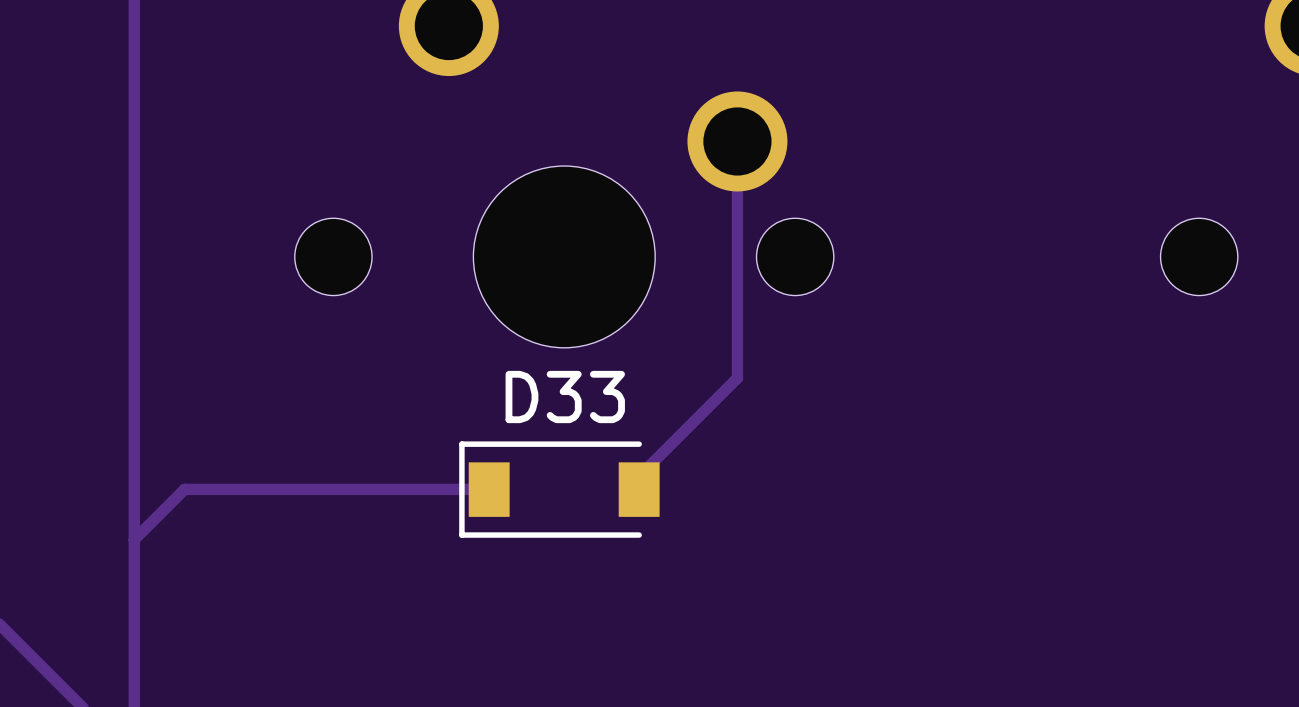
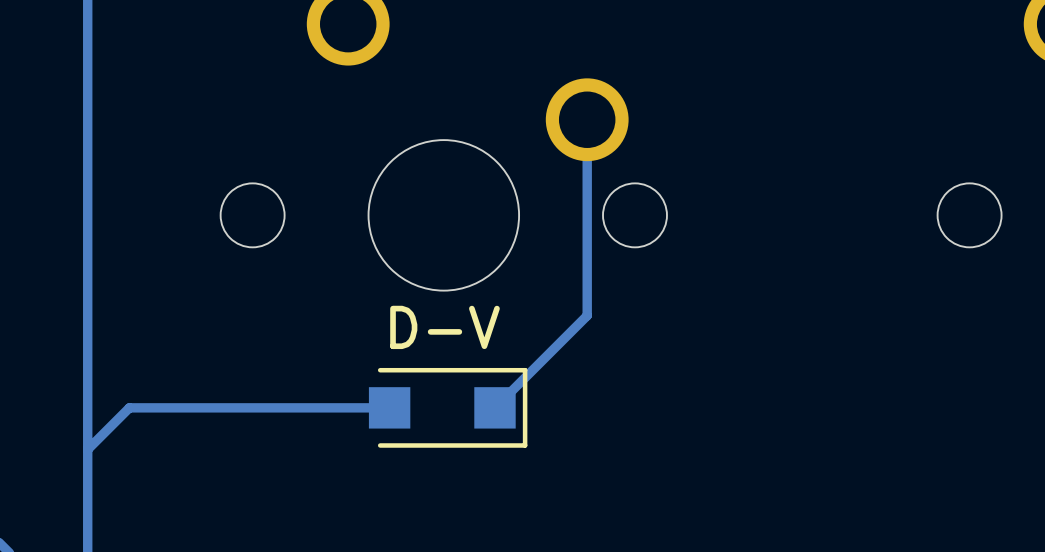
D33: (559, 489) -> none
part: none -> D-V (448, 407)

